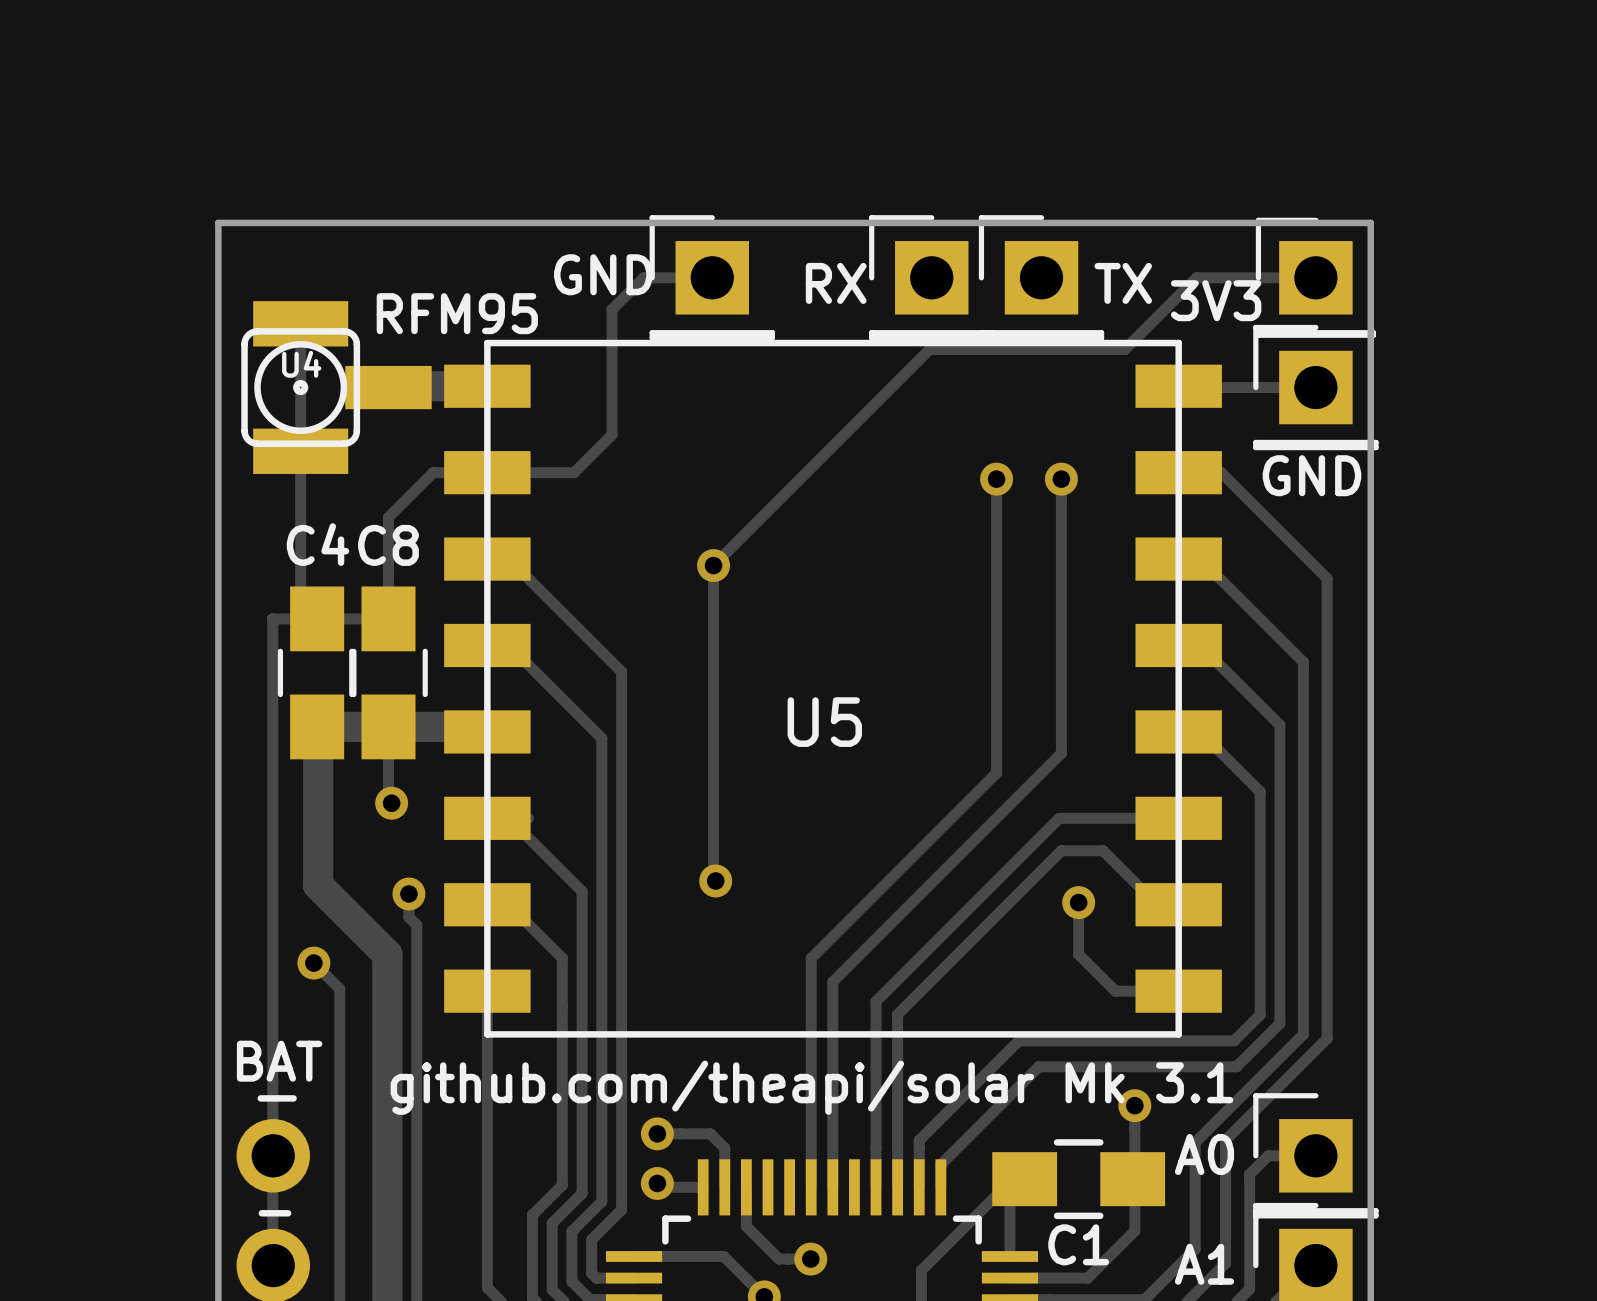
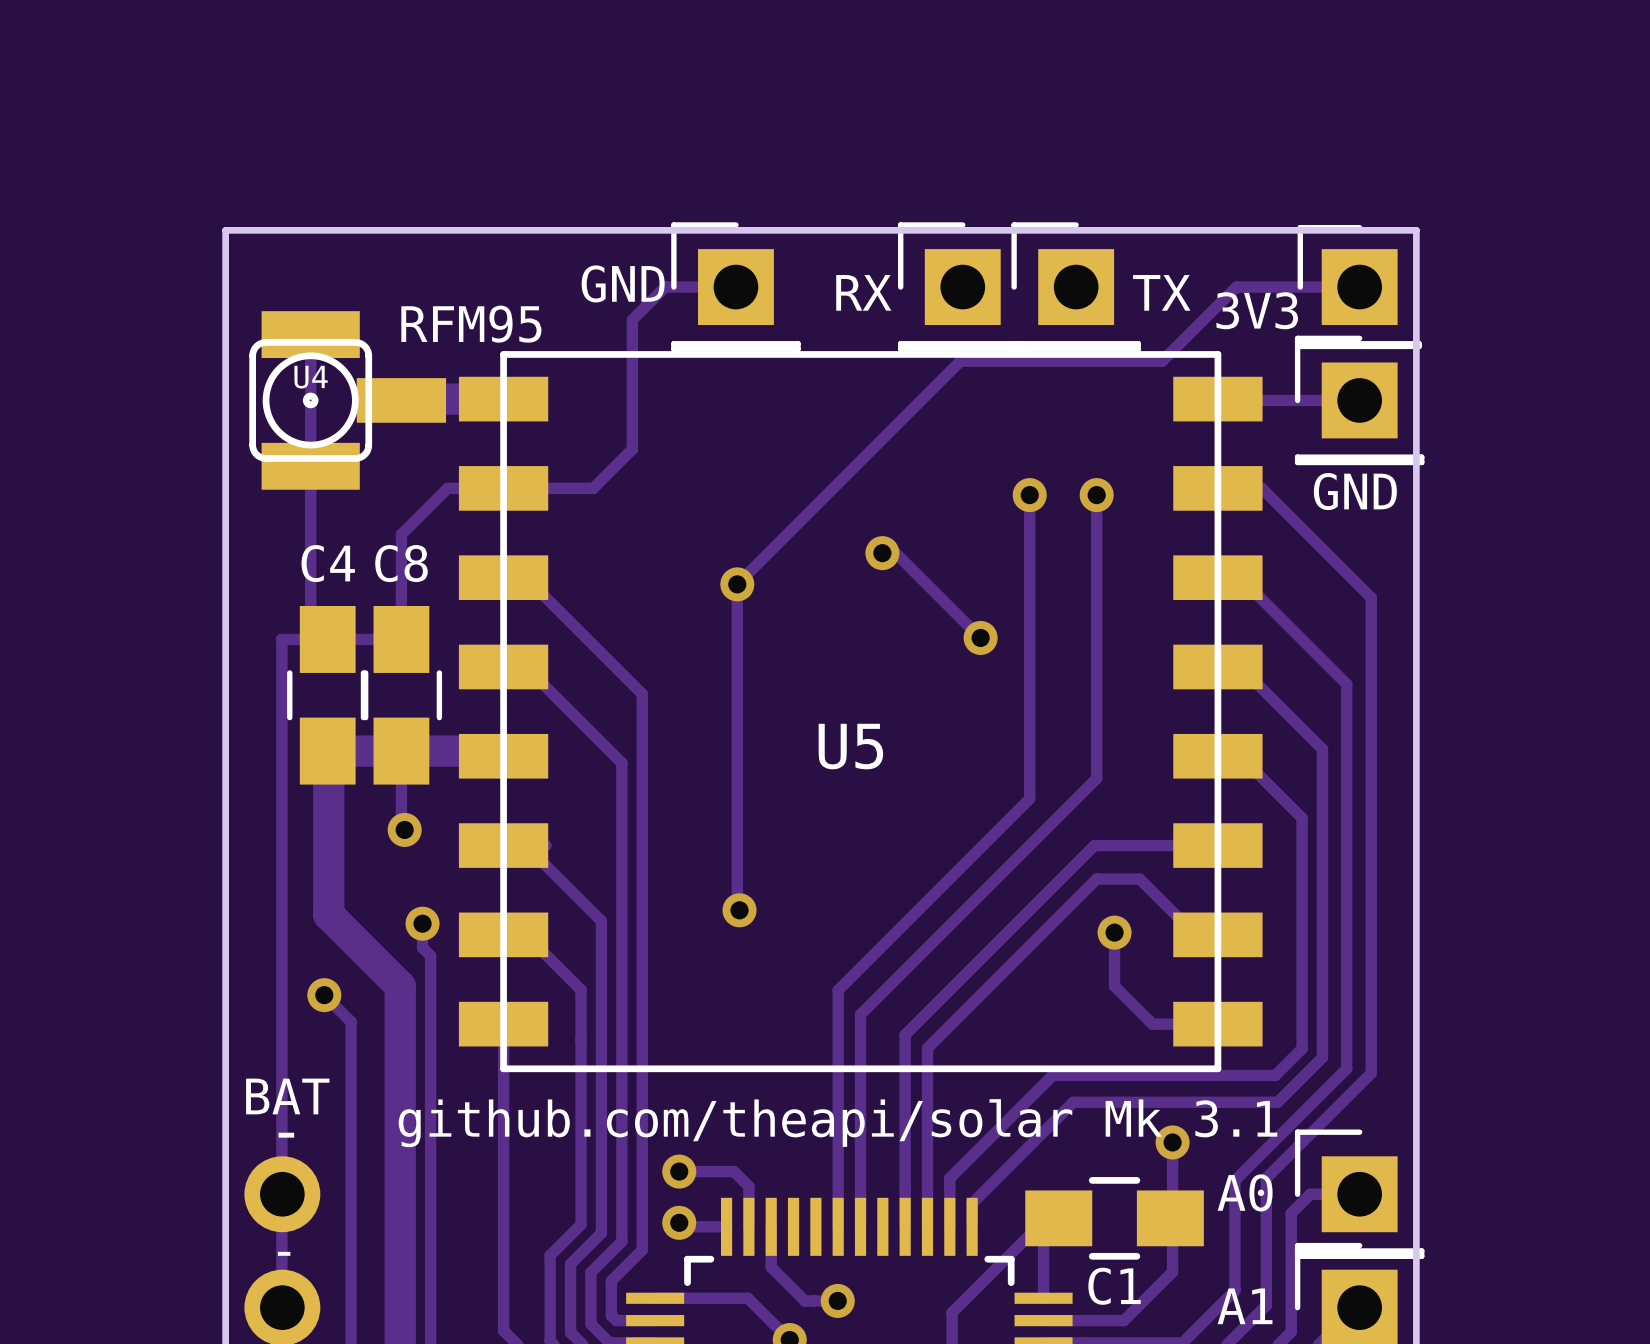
track: none -> (882, 553) (895, 553) (980, 637)
via: none -> (882, 553)
via: none -> (980, 637)

